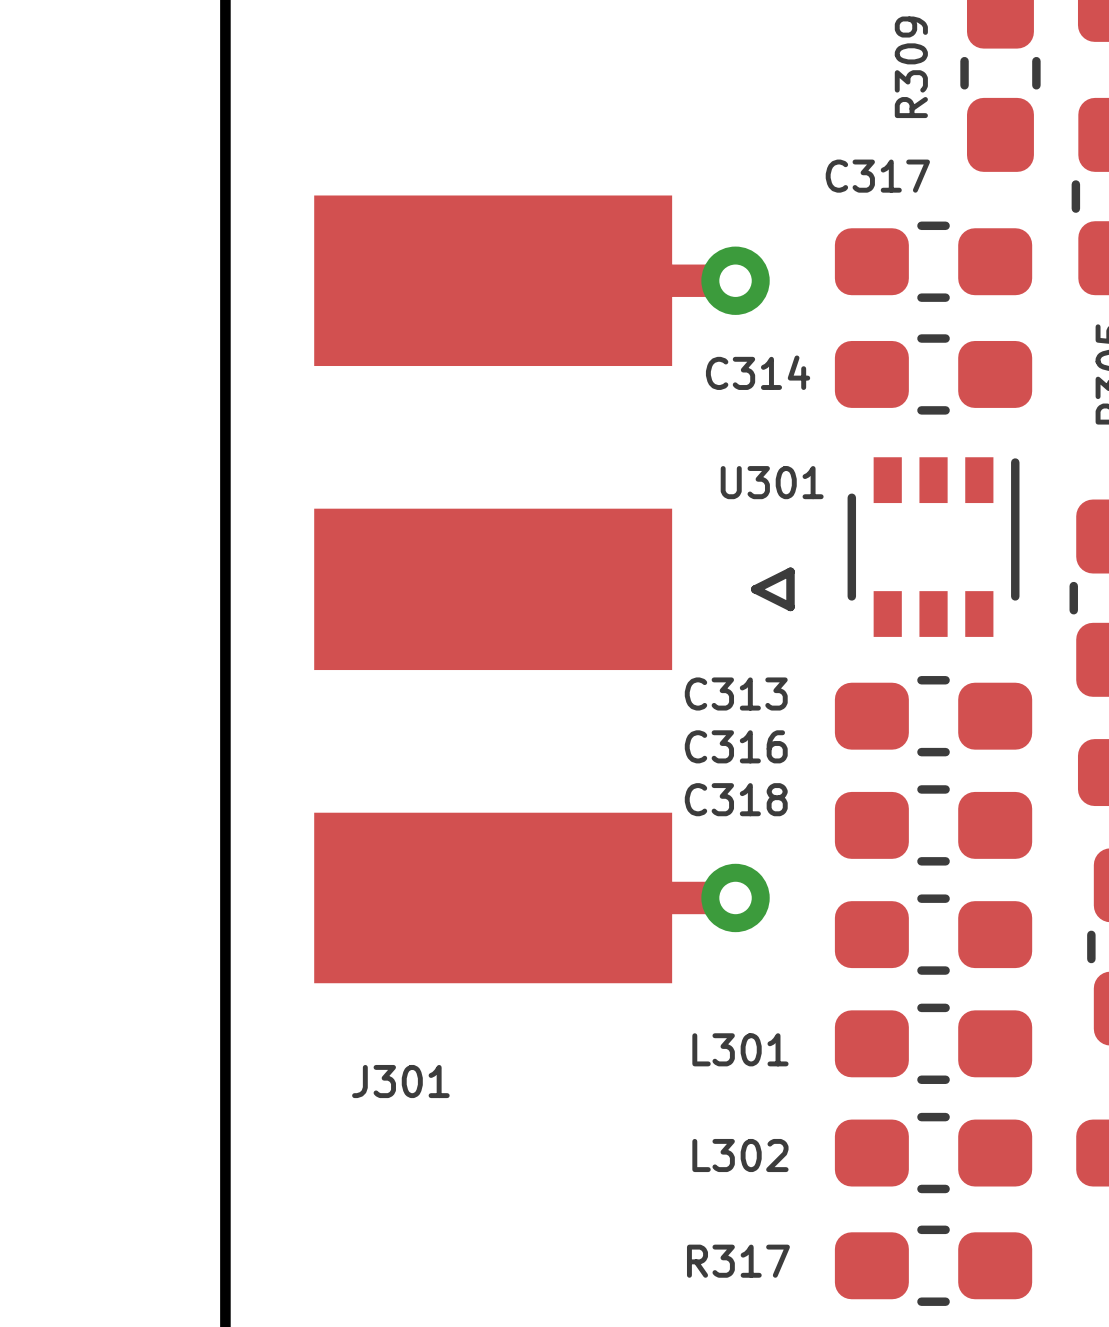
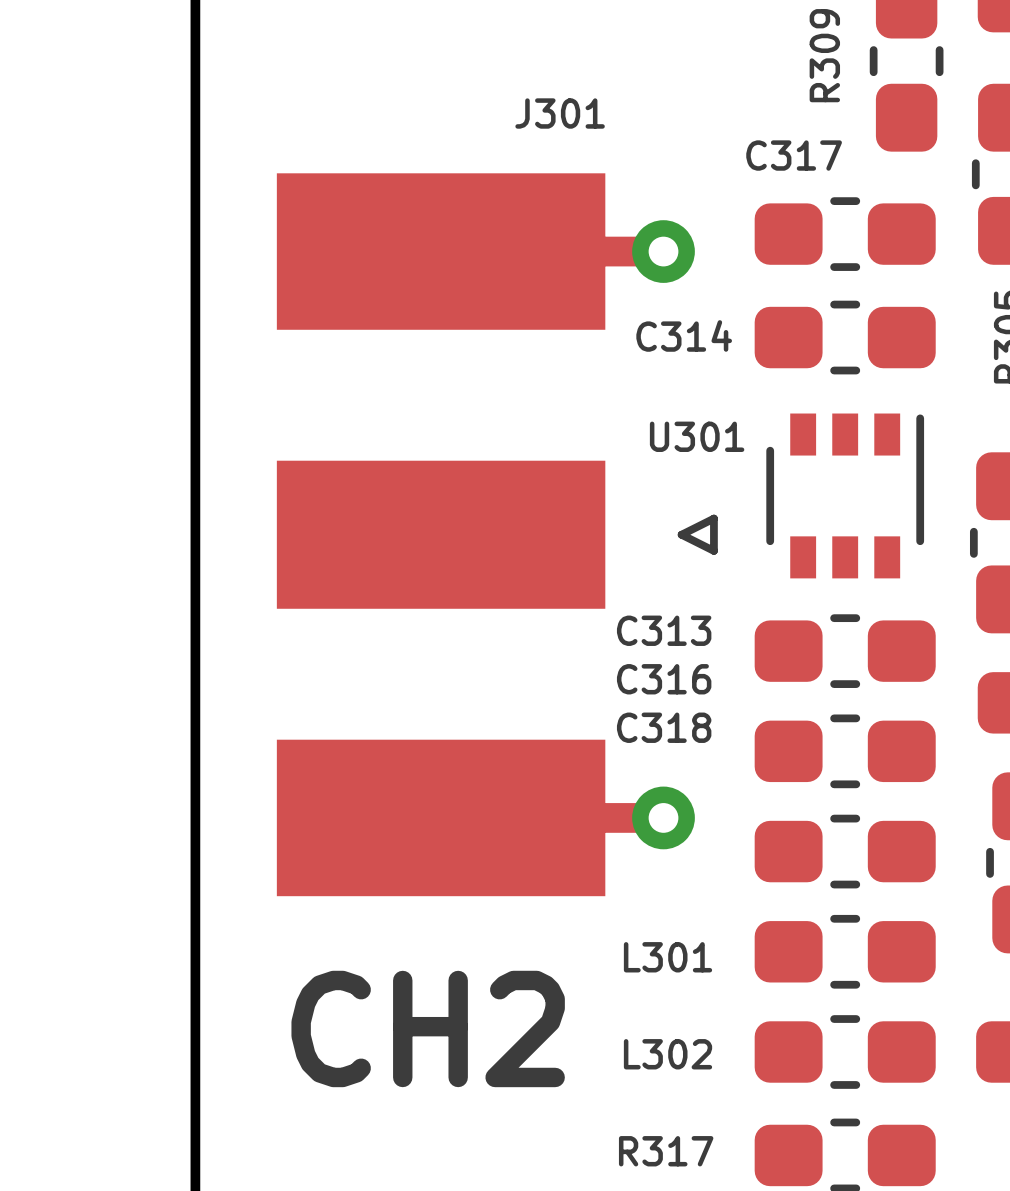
J301 name position: J301 (400, 1081) -> J301 (560, 113)
text: none -> CH2 (428, 1028)

